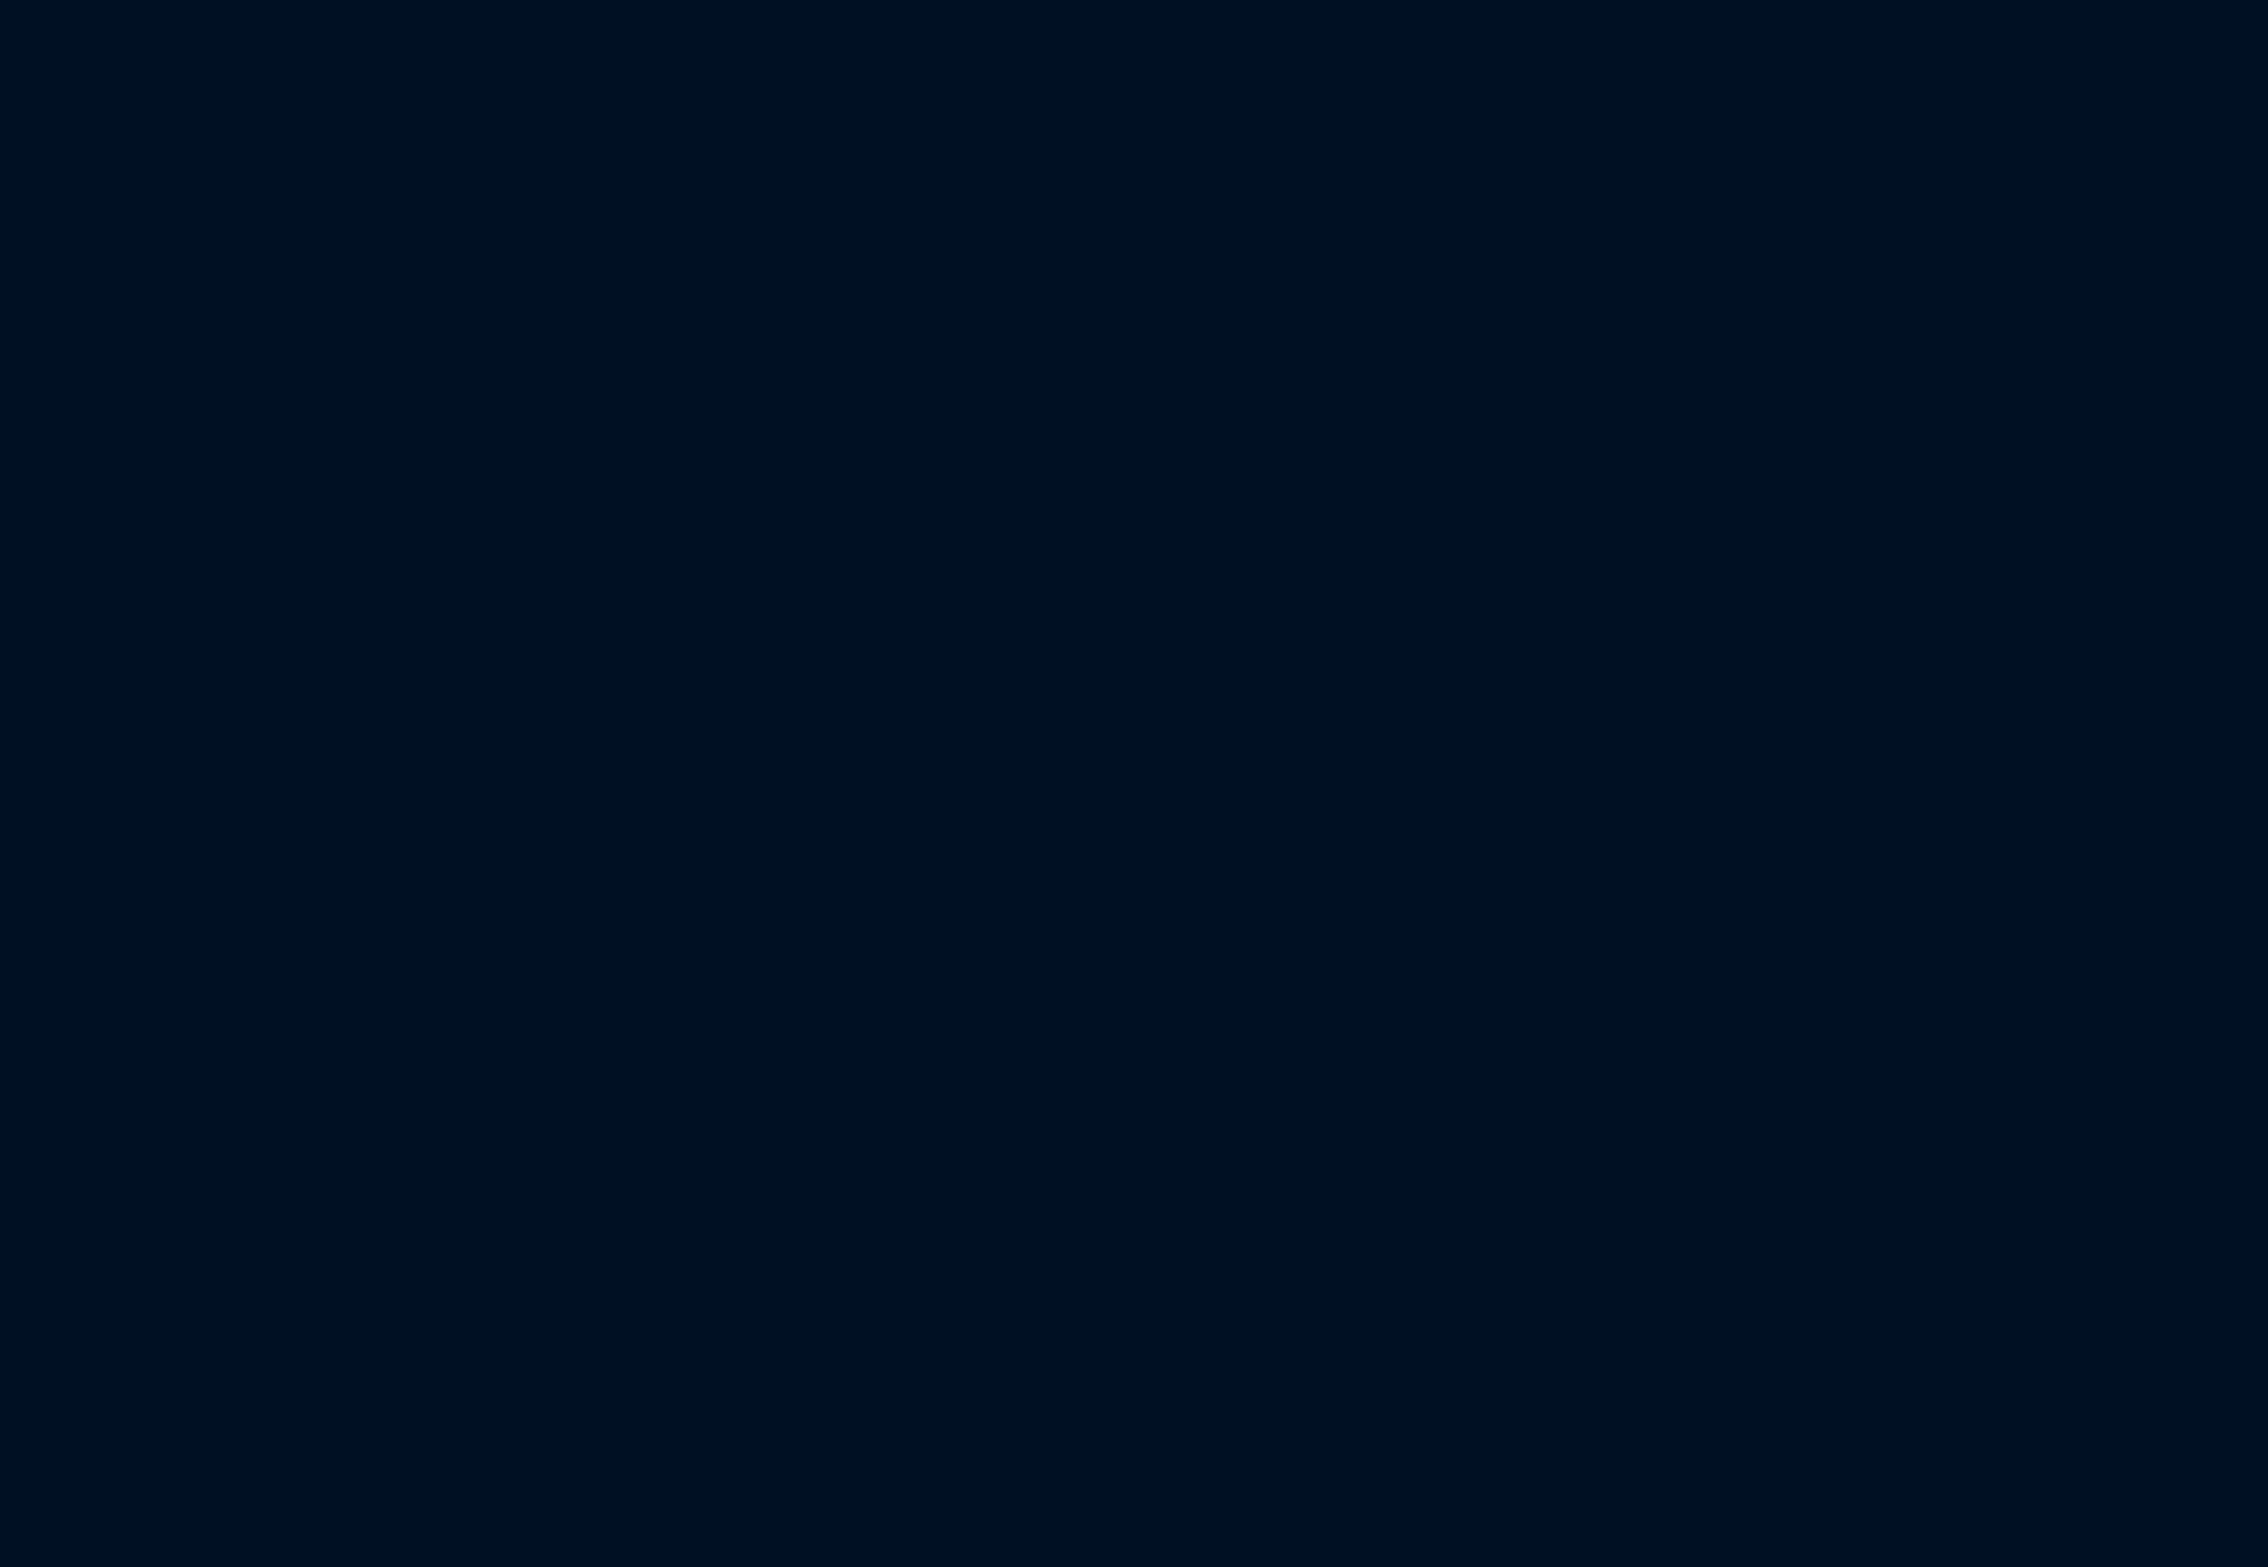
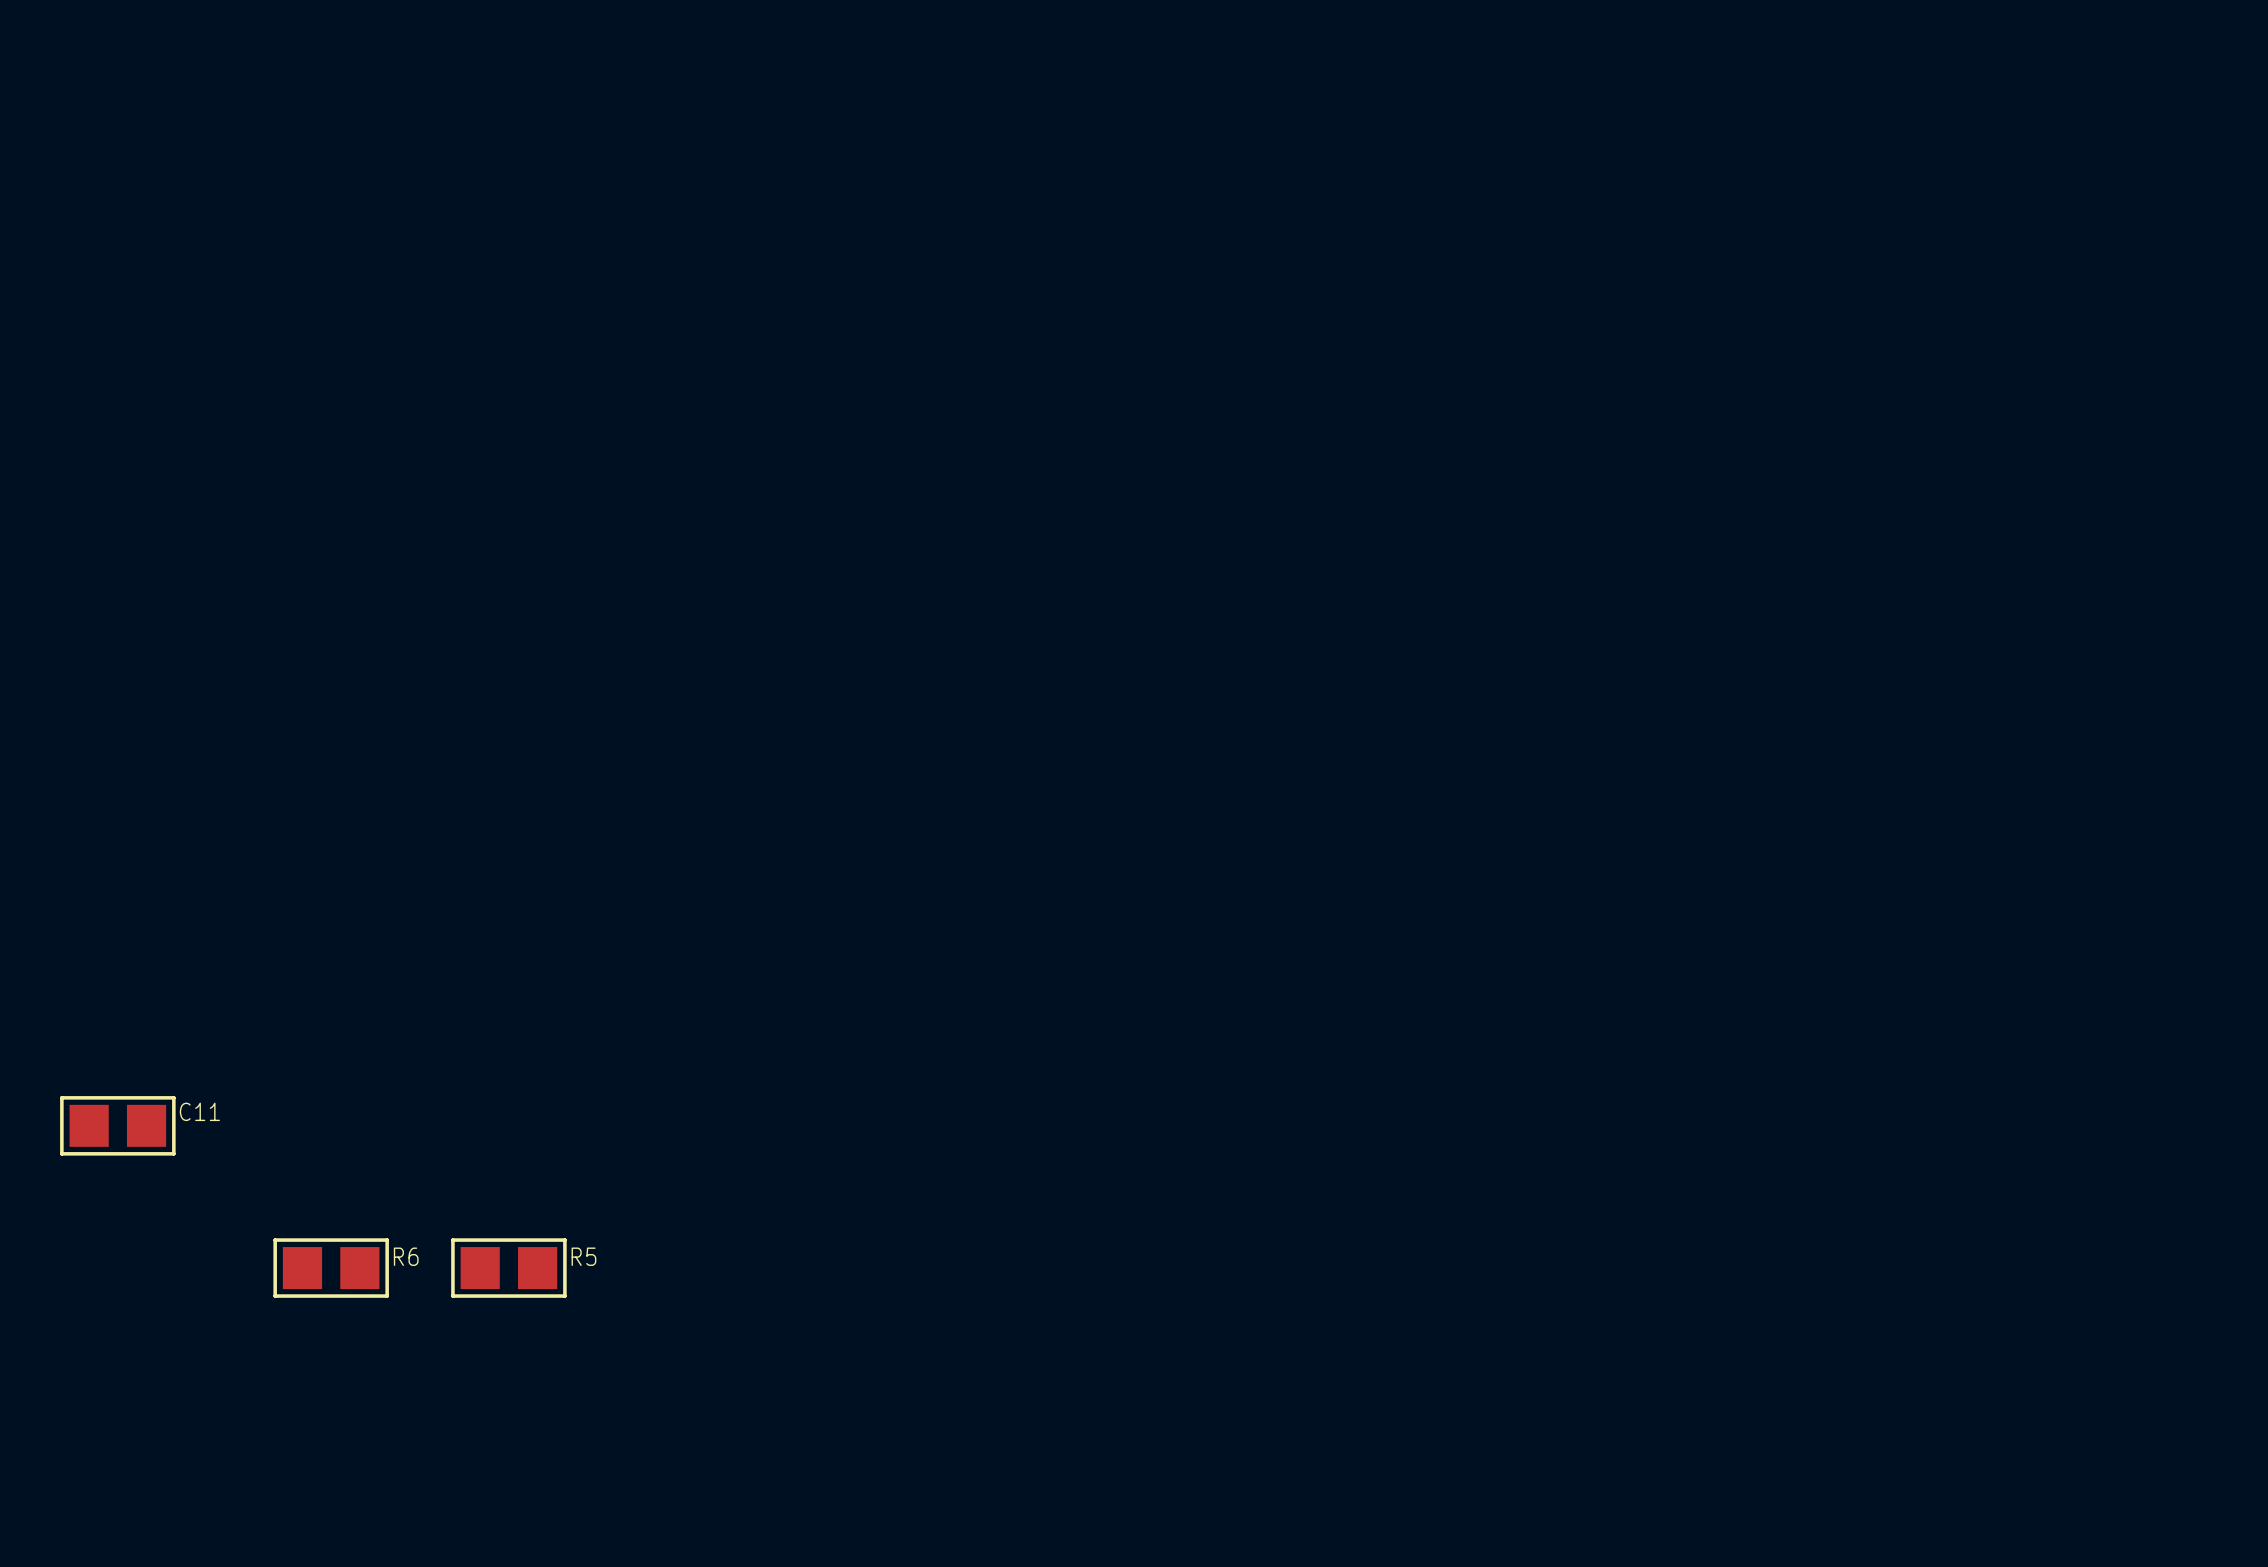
C11: none -> (117, 1125)
R6: none -> (331, 1268)
R5: none -> (508, 1268)

